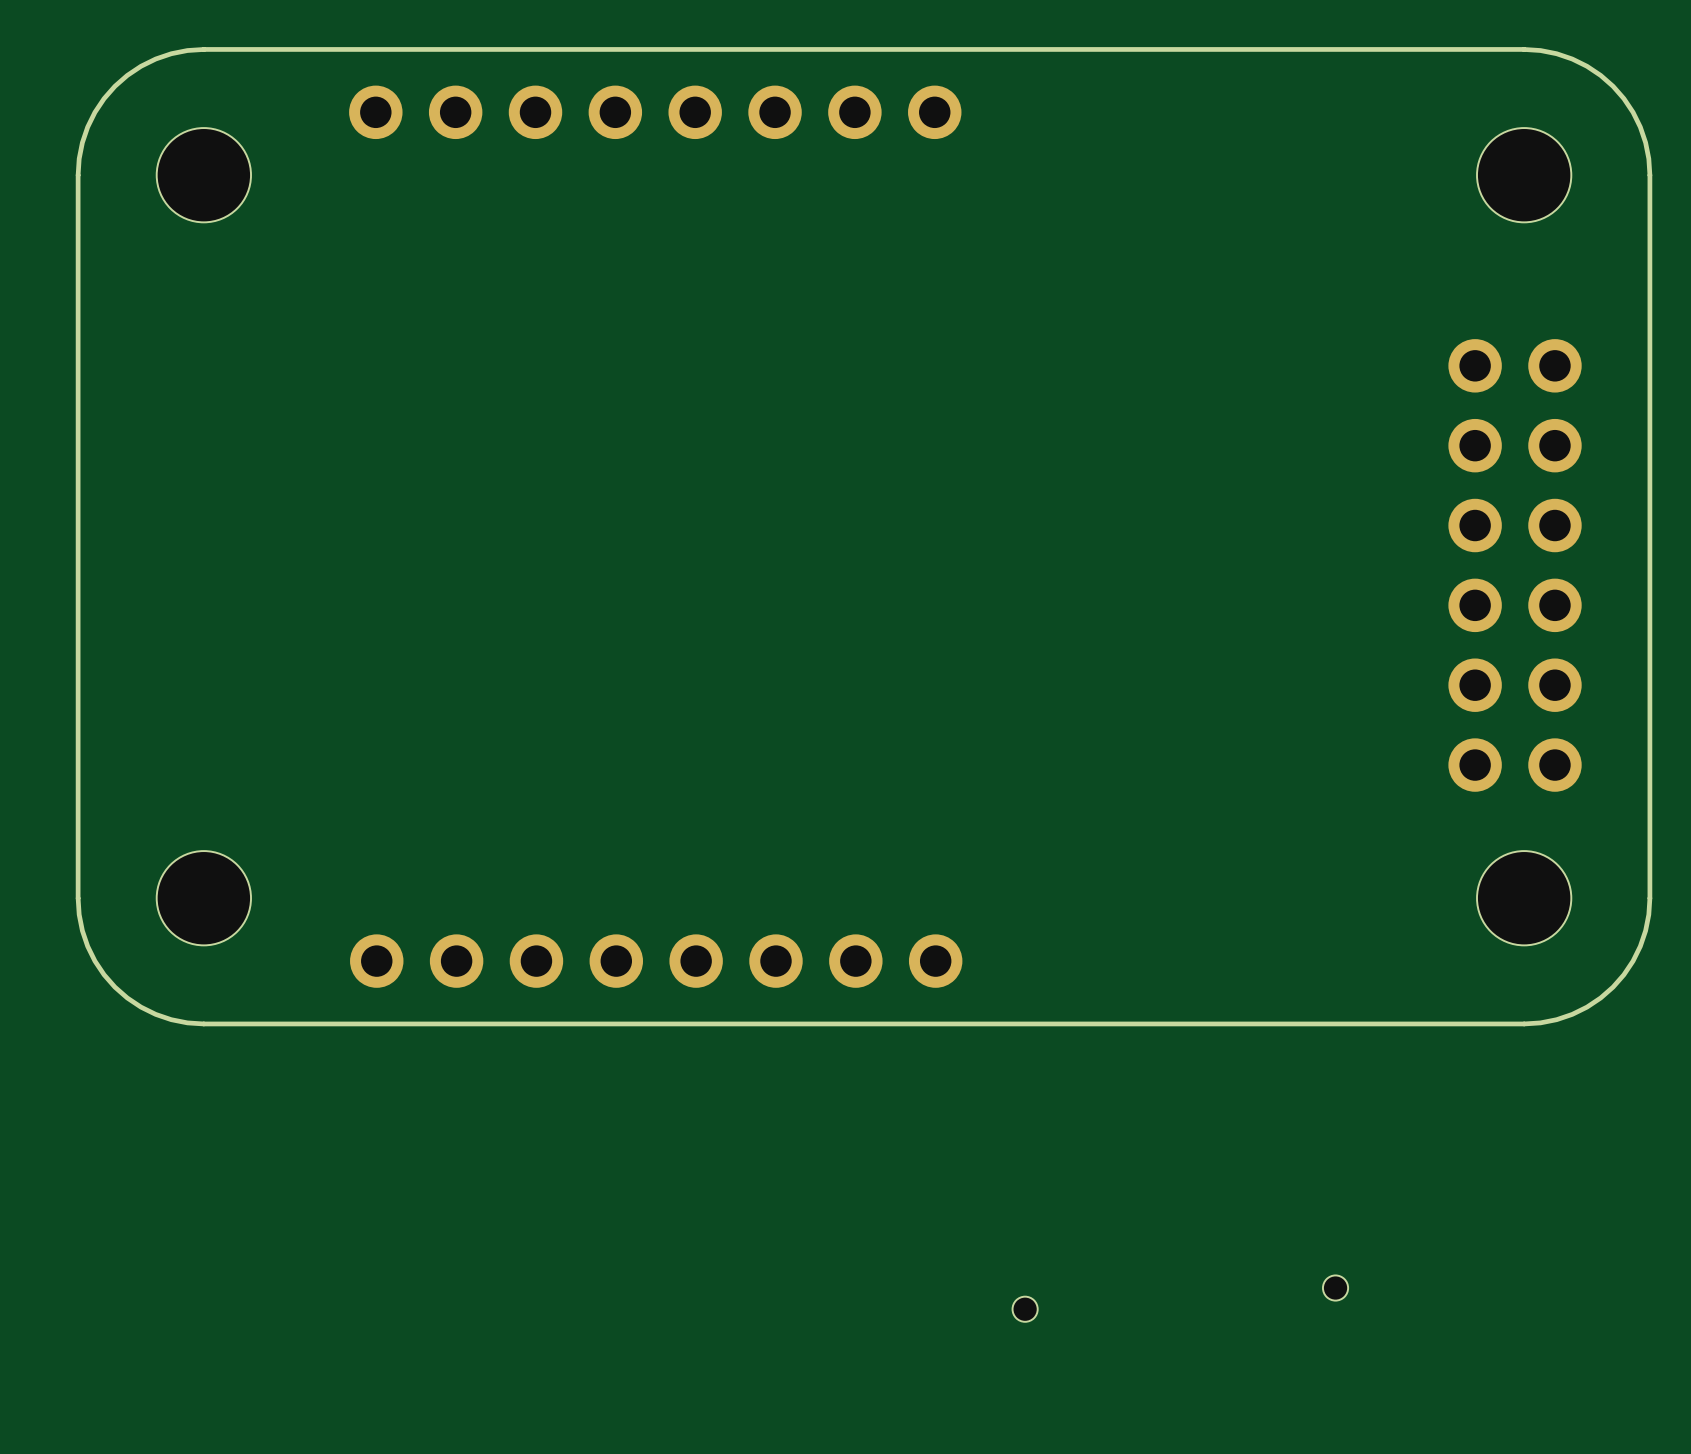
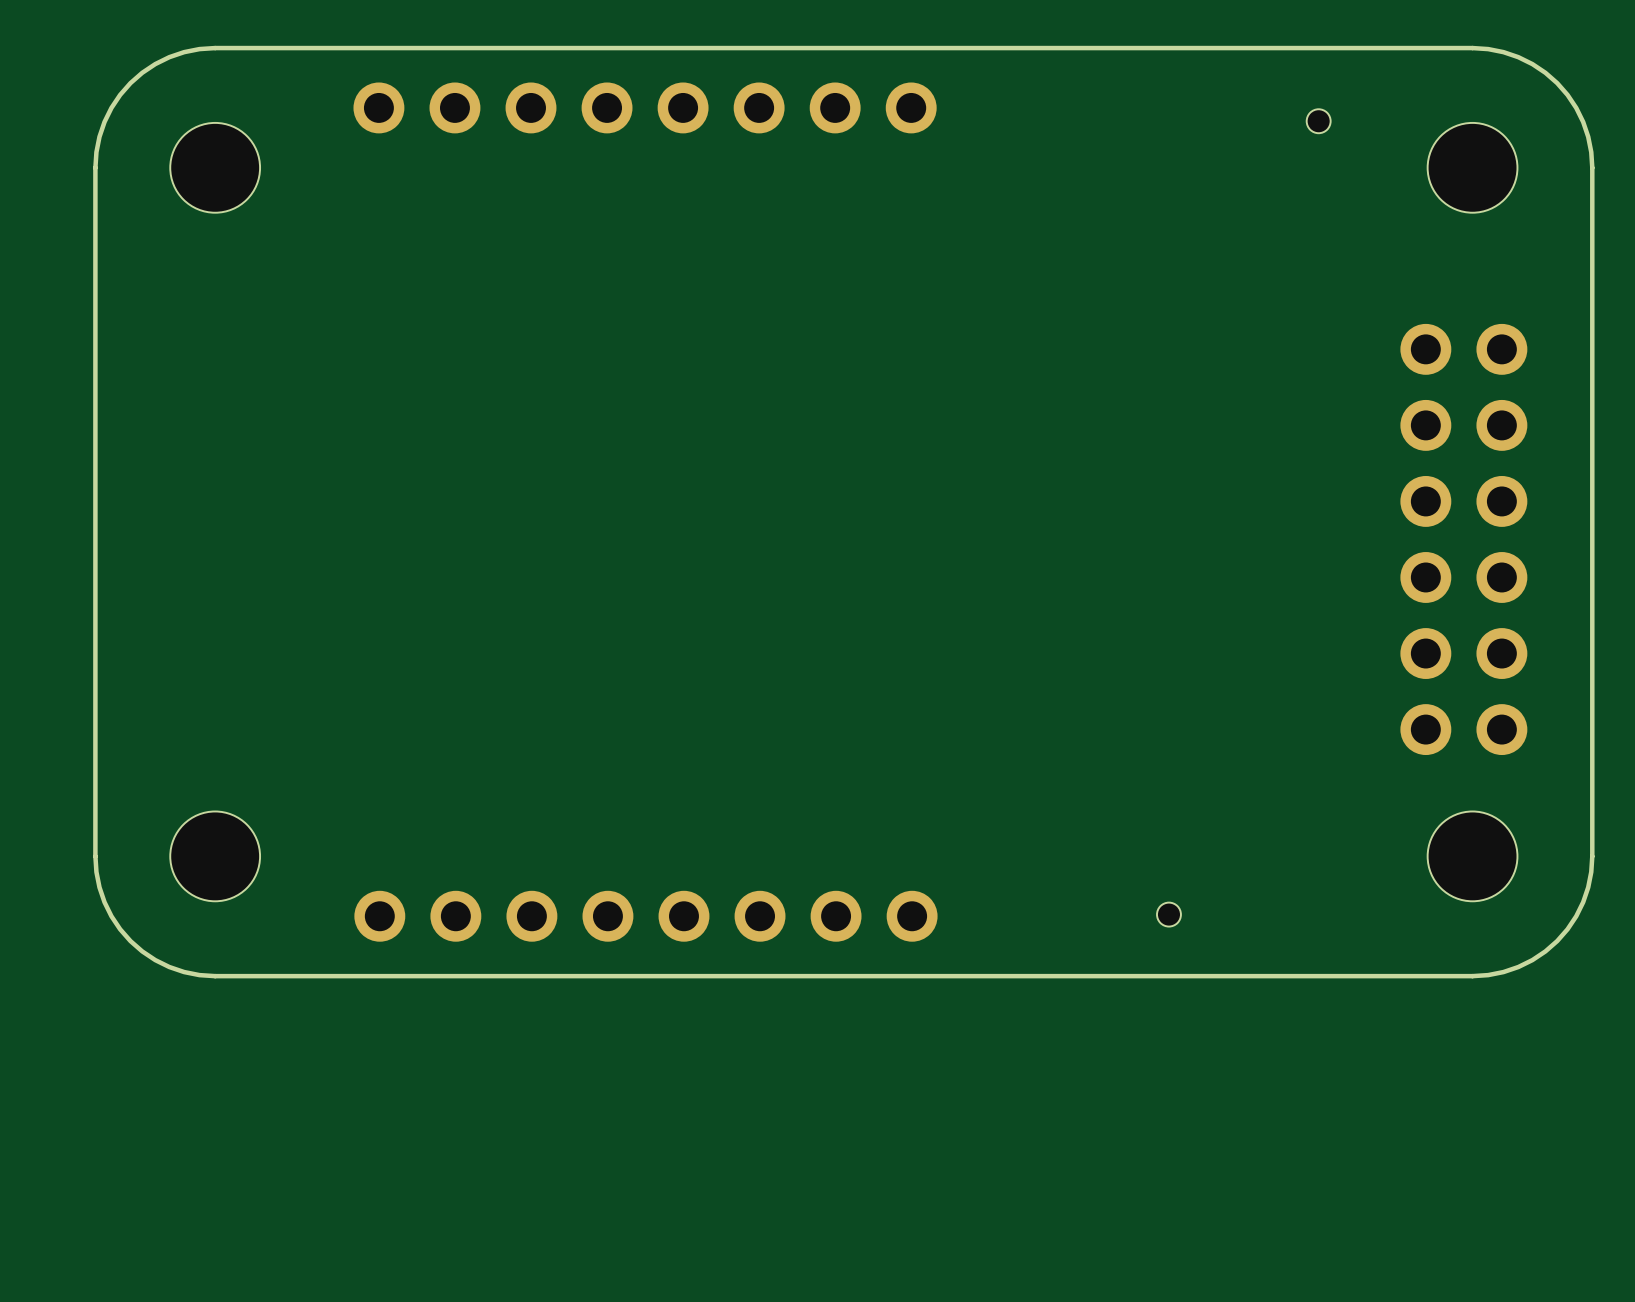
part: none -> (1318, 121)
part: none -> (1168, 914)
part: (1335, 1288) -> none
part: (1025, 1309) -> none

